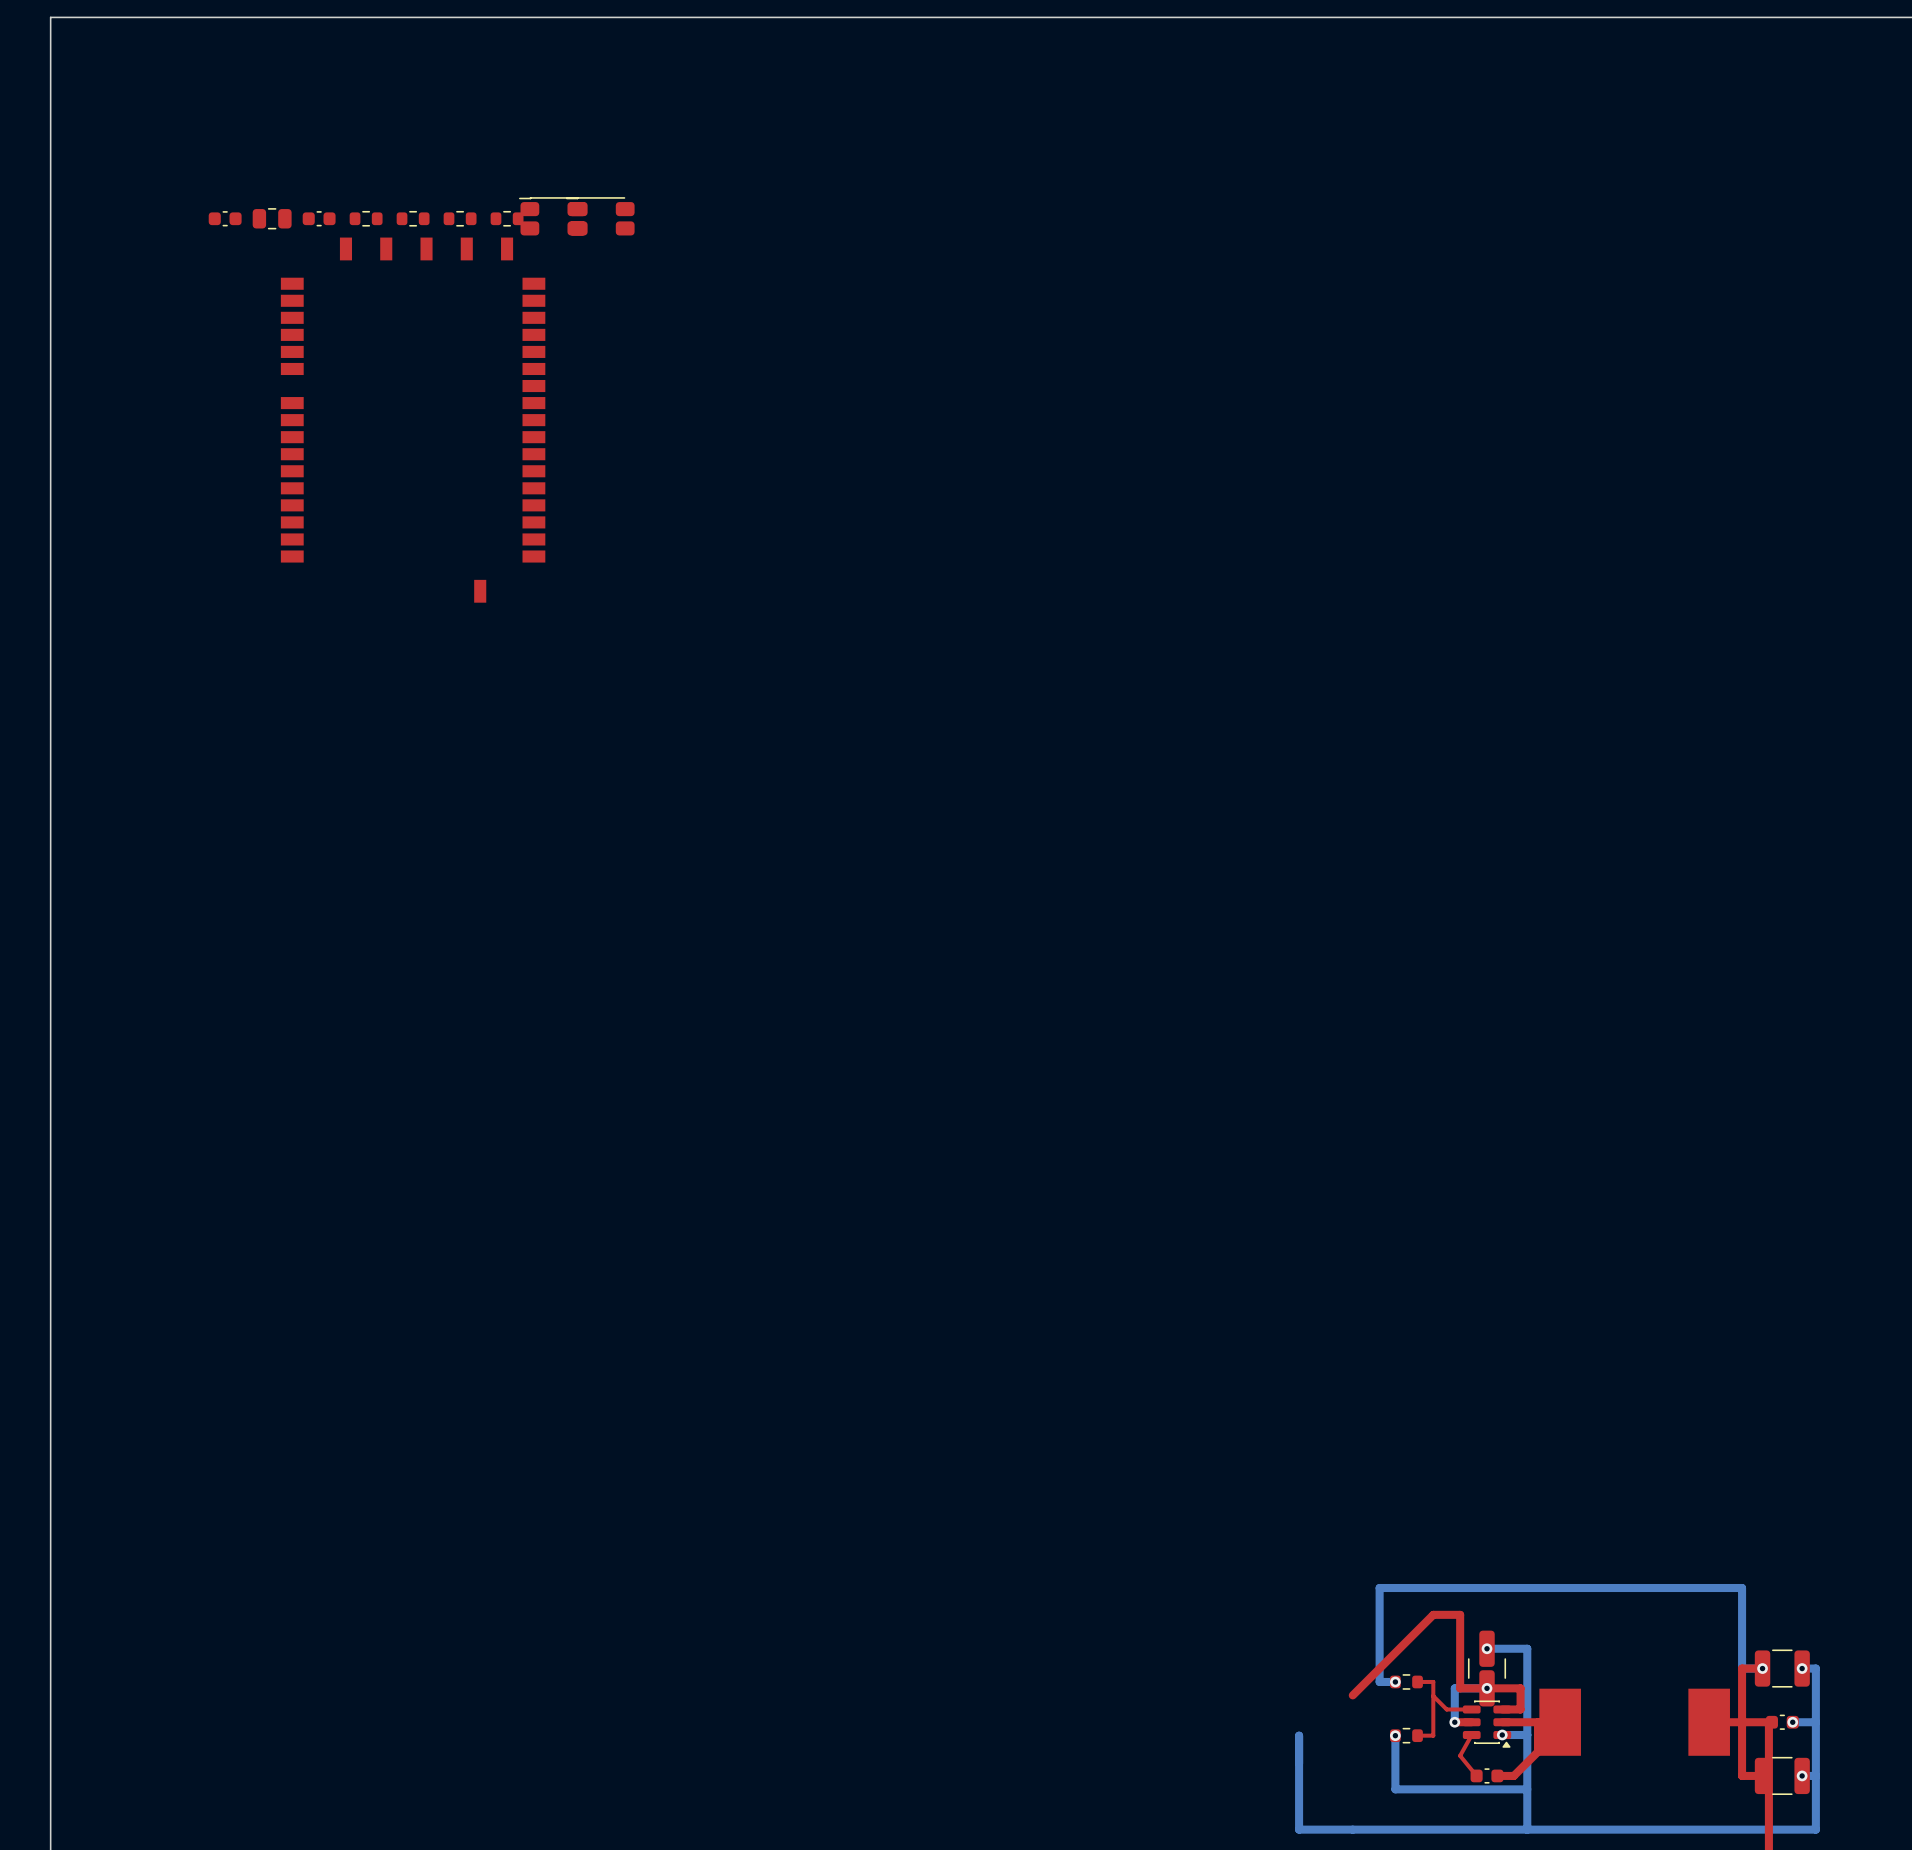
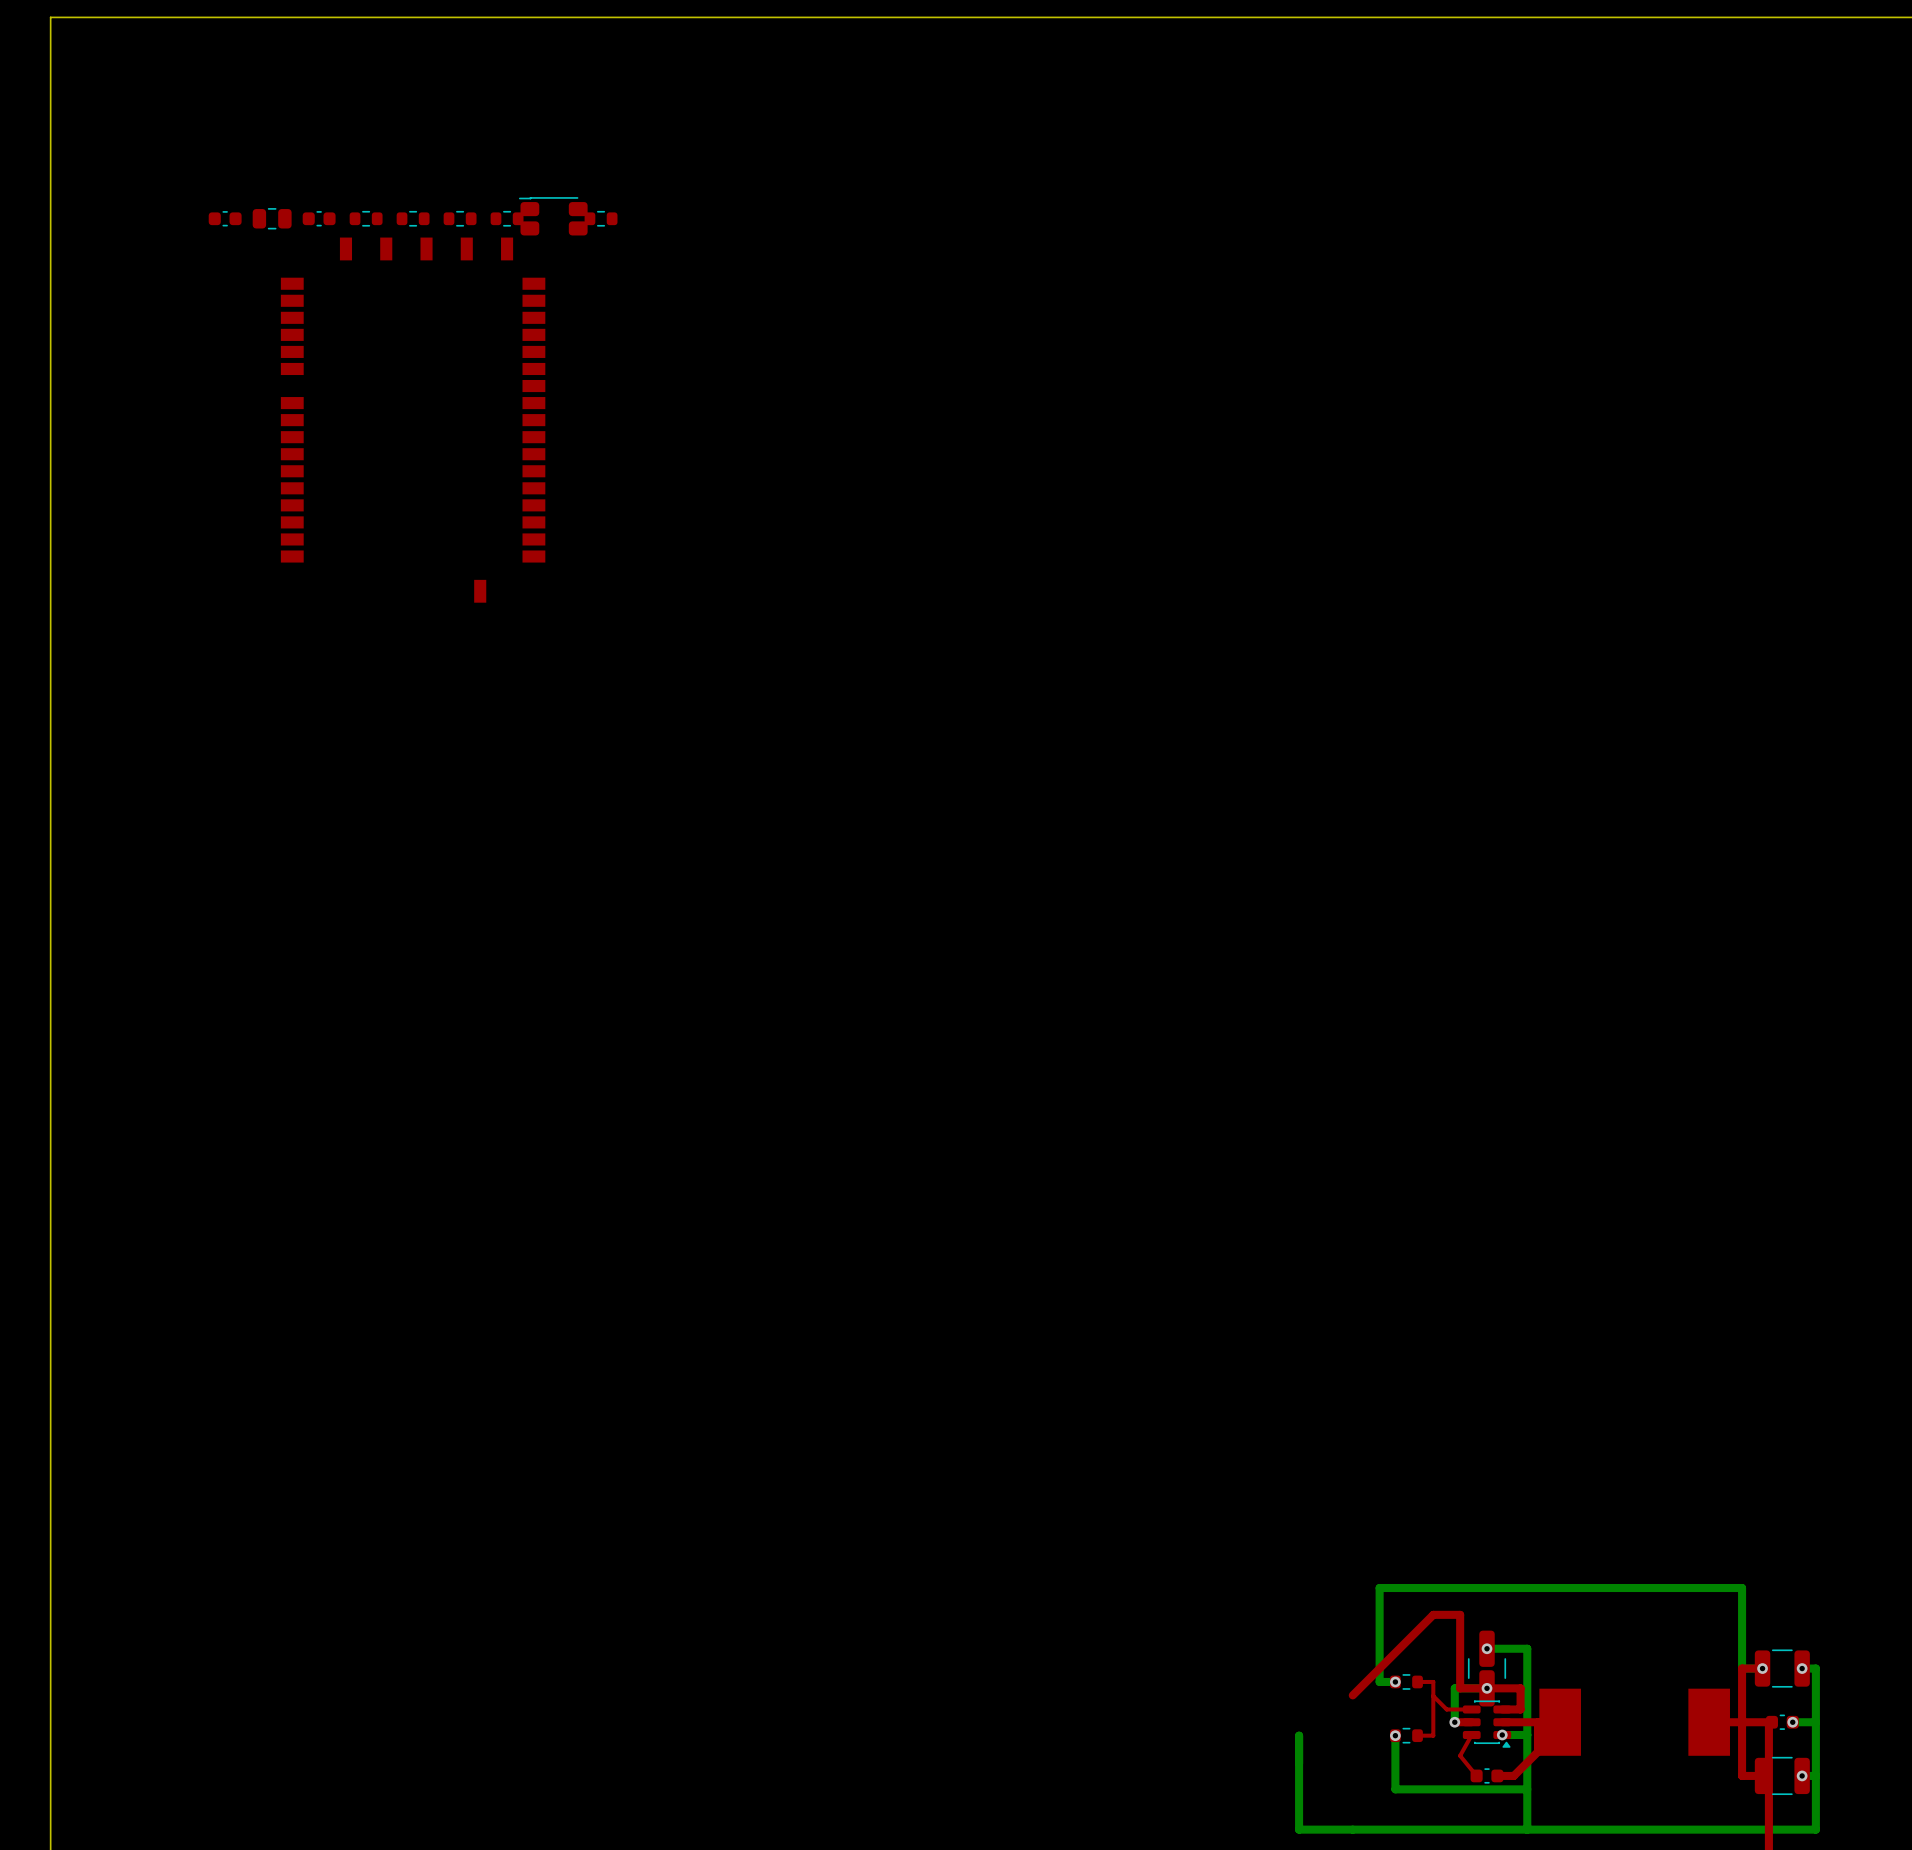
part footprint: [565, 197, 635, 236] -> [584, 210, 618, 227]

